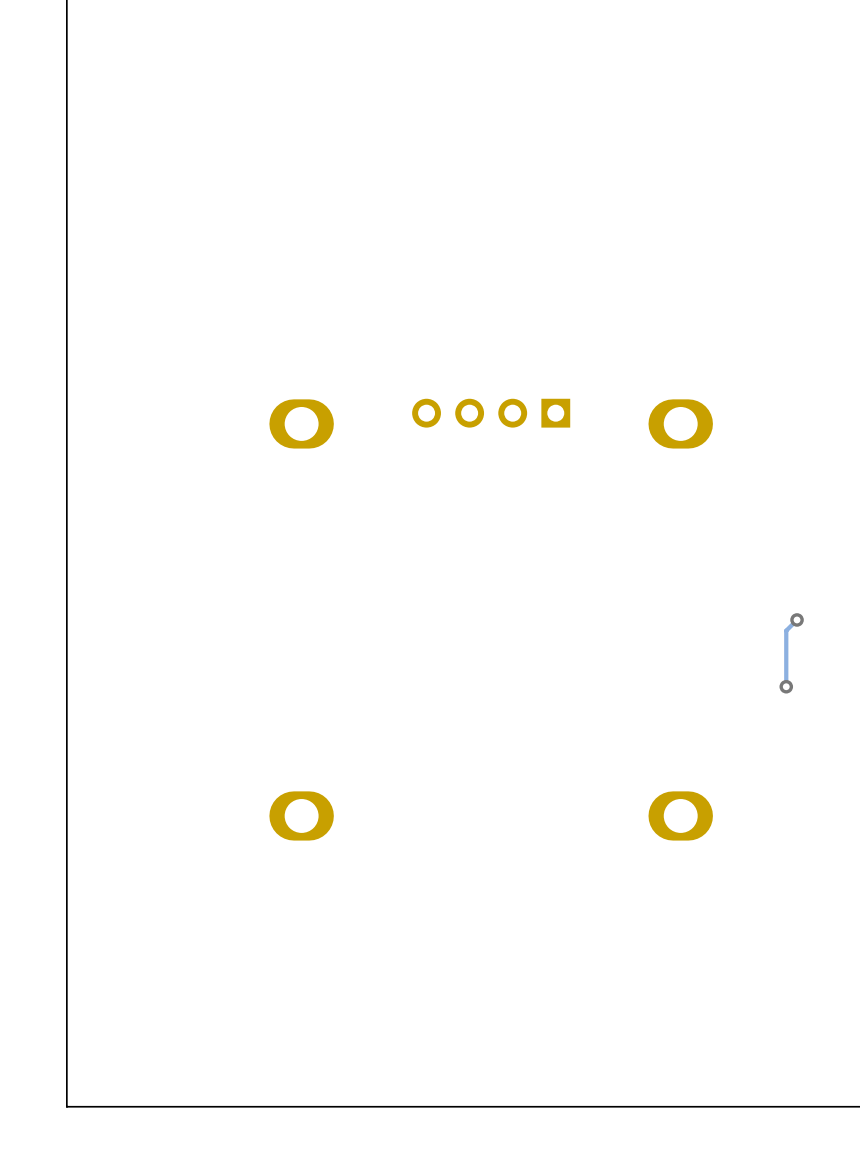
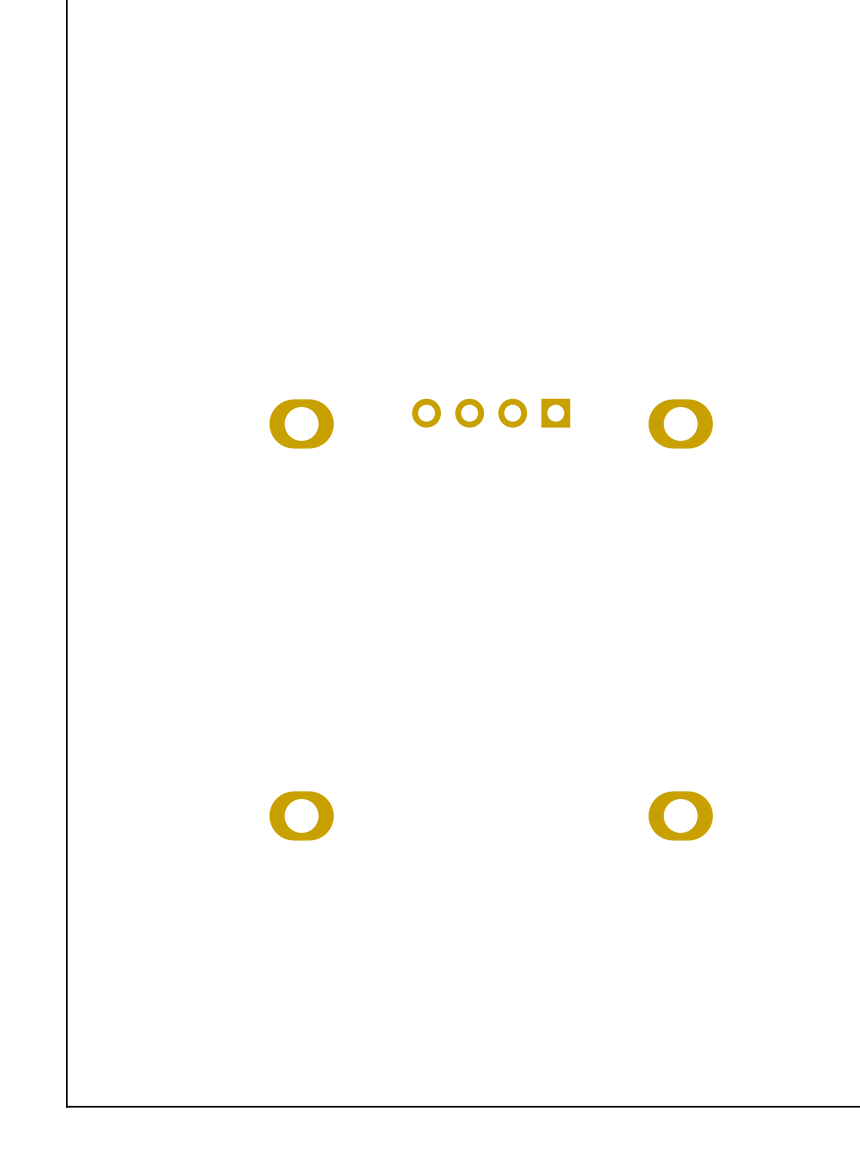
track: (797, 619) (786, 630) (786, 686) -> none
via: (797, 619) -> none
via: (786, 686) -> none

